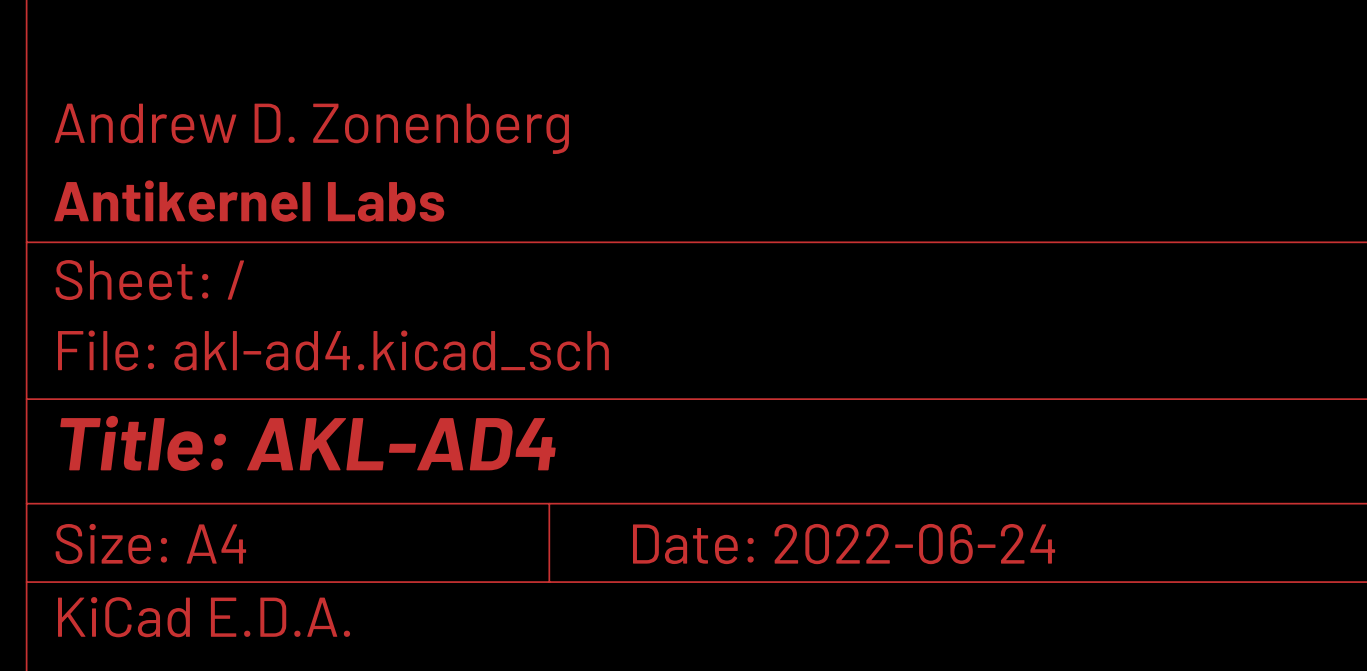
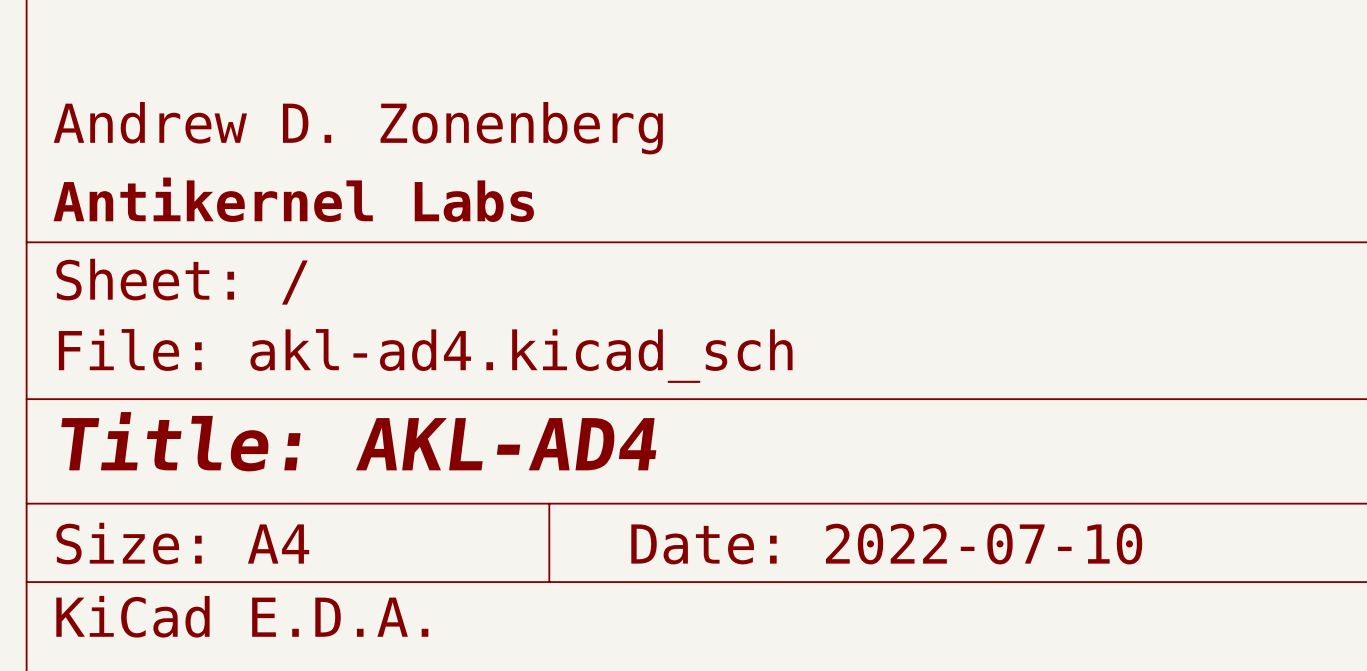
title block: Date: 2022-06-24 (844, 544) -> Date: 2022-07-10 (886, 544)

